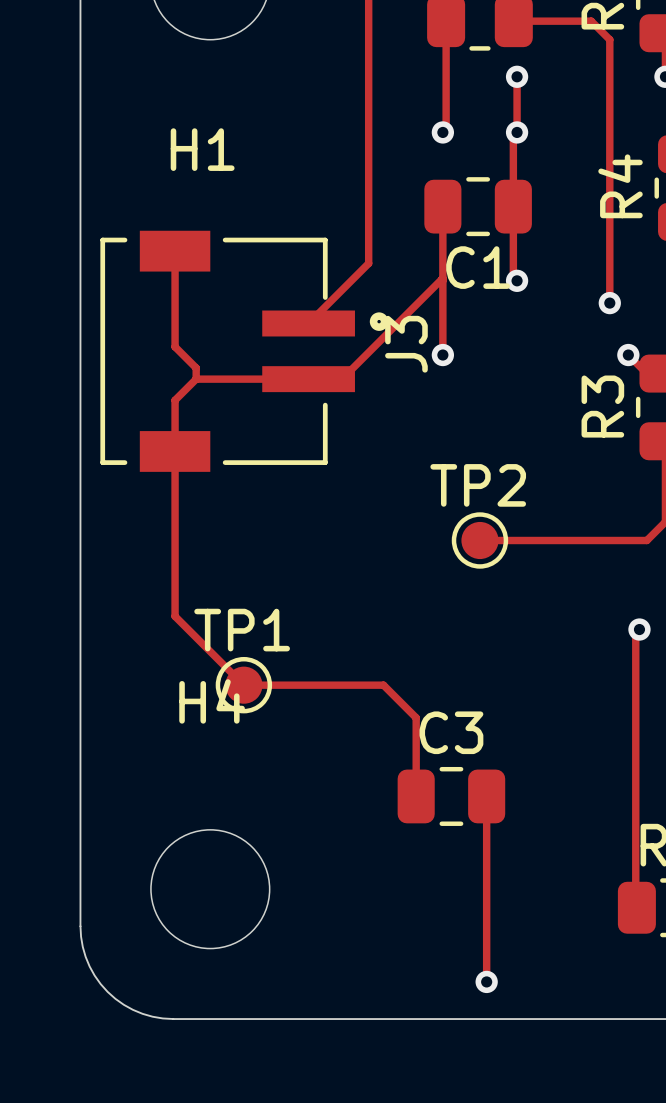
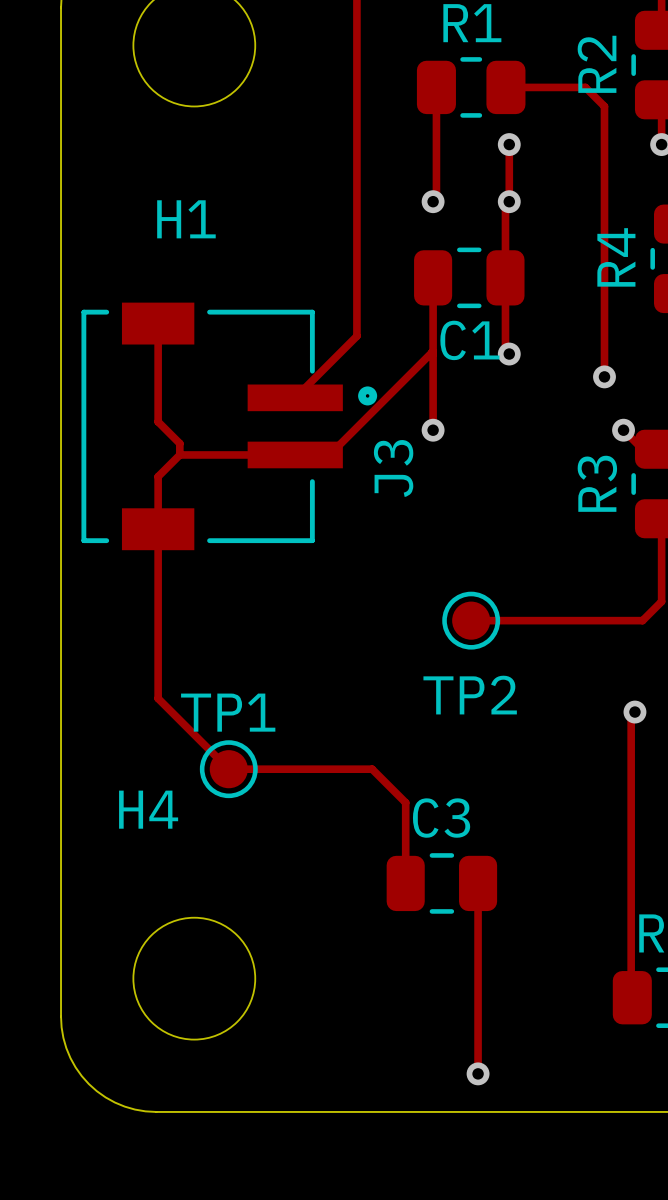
J3 name position: J3 (406, 344) -> J3 (393, 468)
TP2 name position: TP2 (478, 485) -> TP2 (470, 695)
H4 name position: H4 (212, 701) -> H4 (148, 809)

